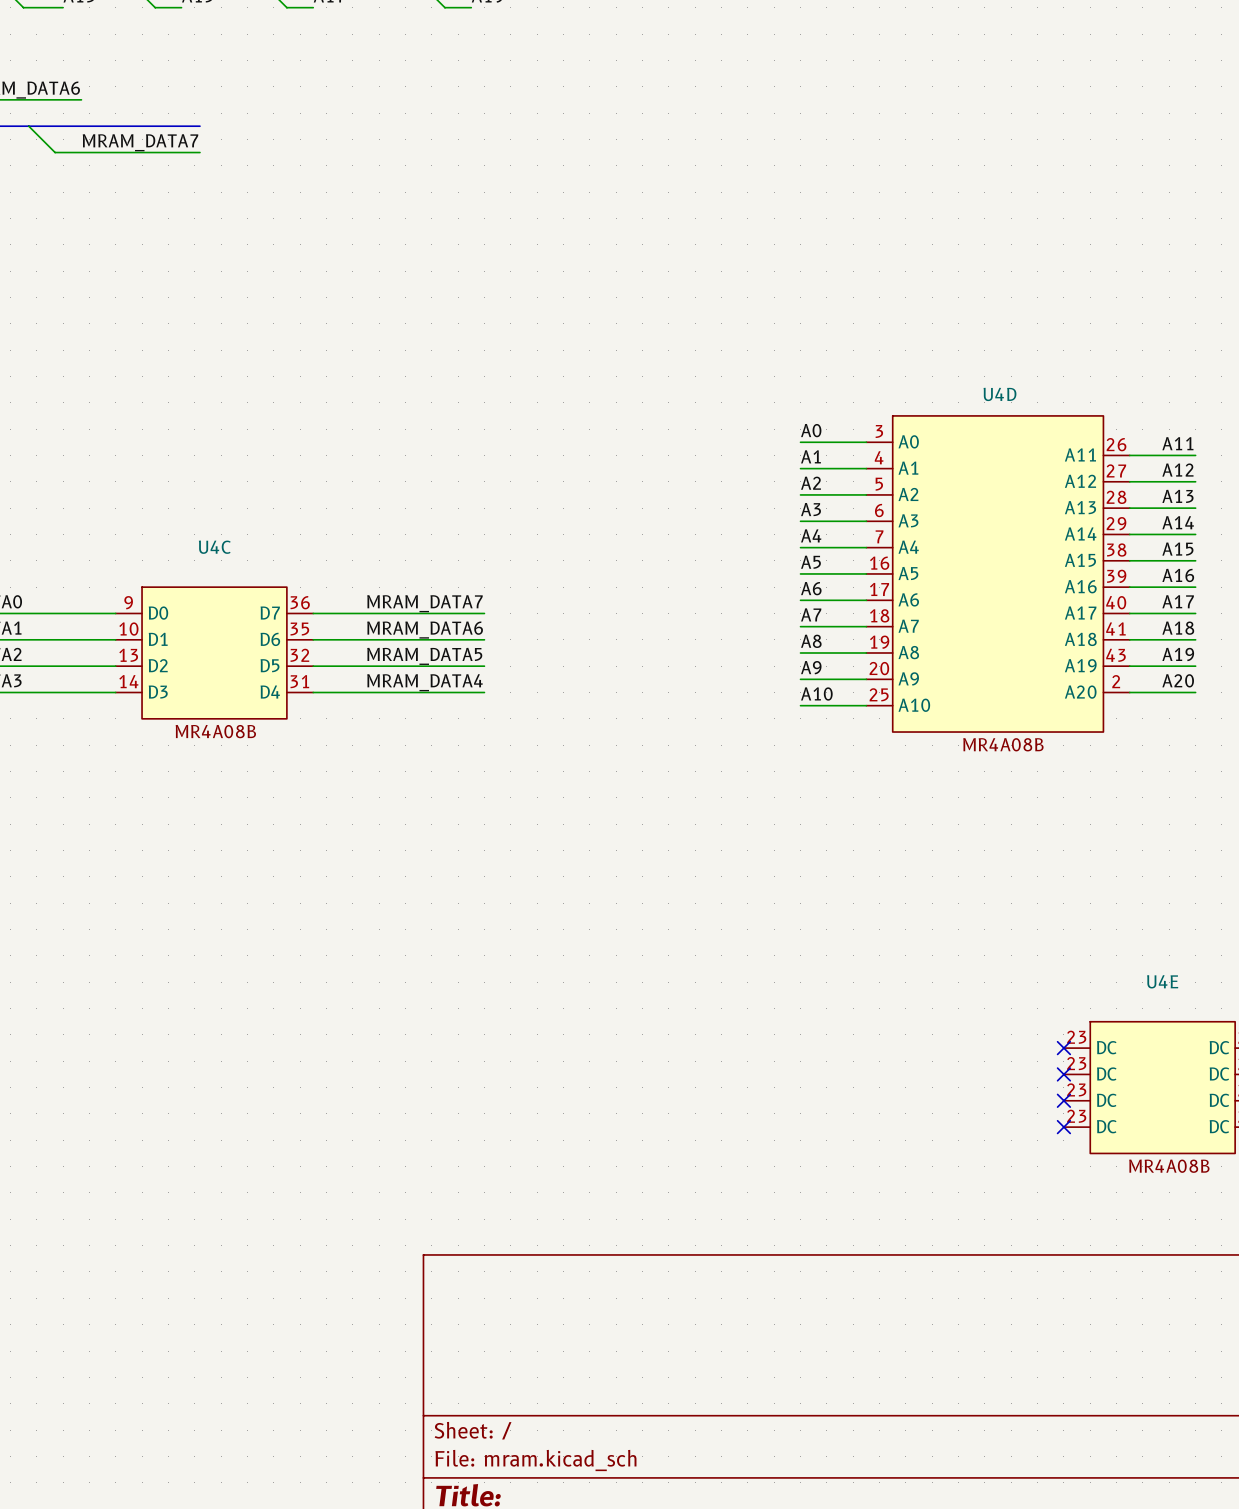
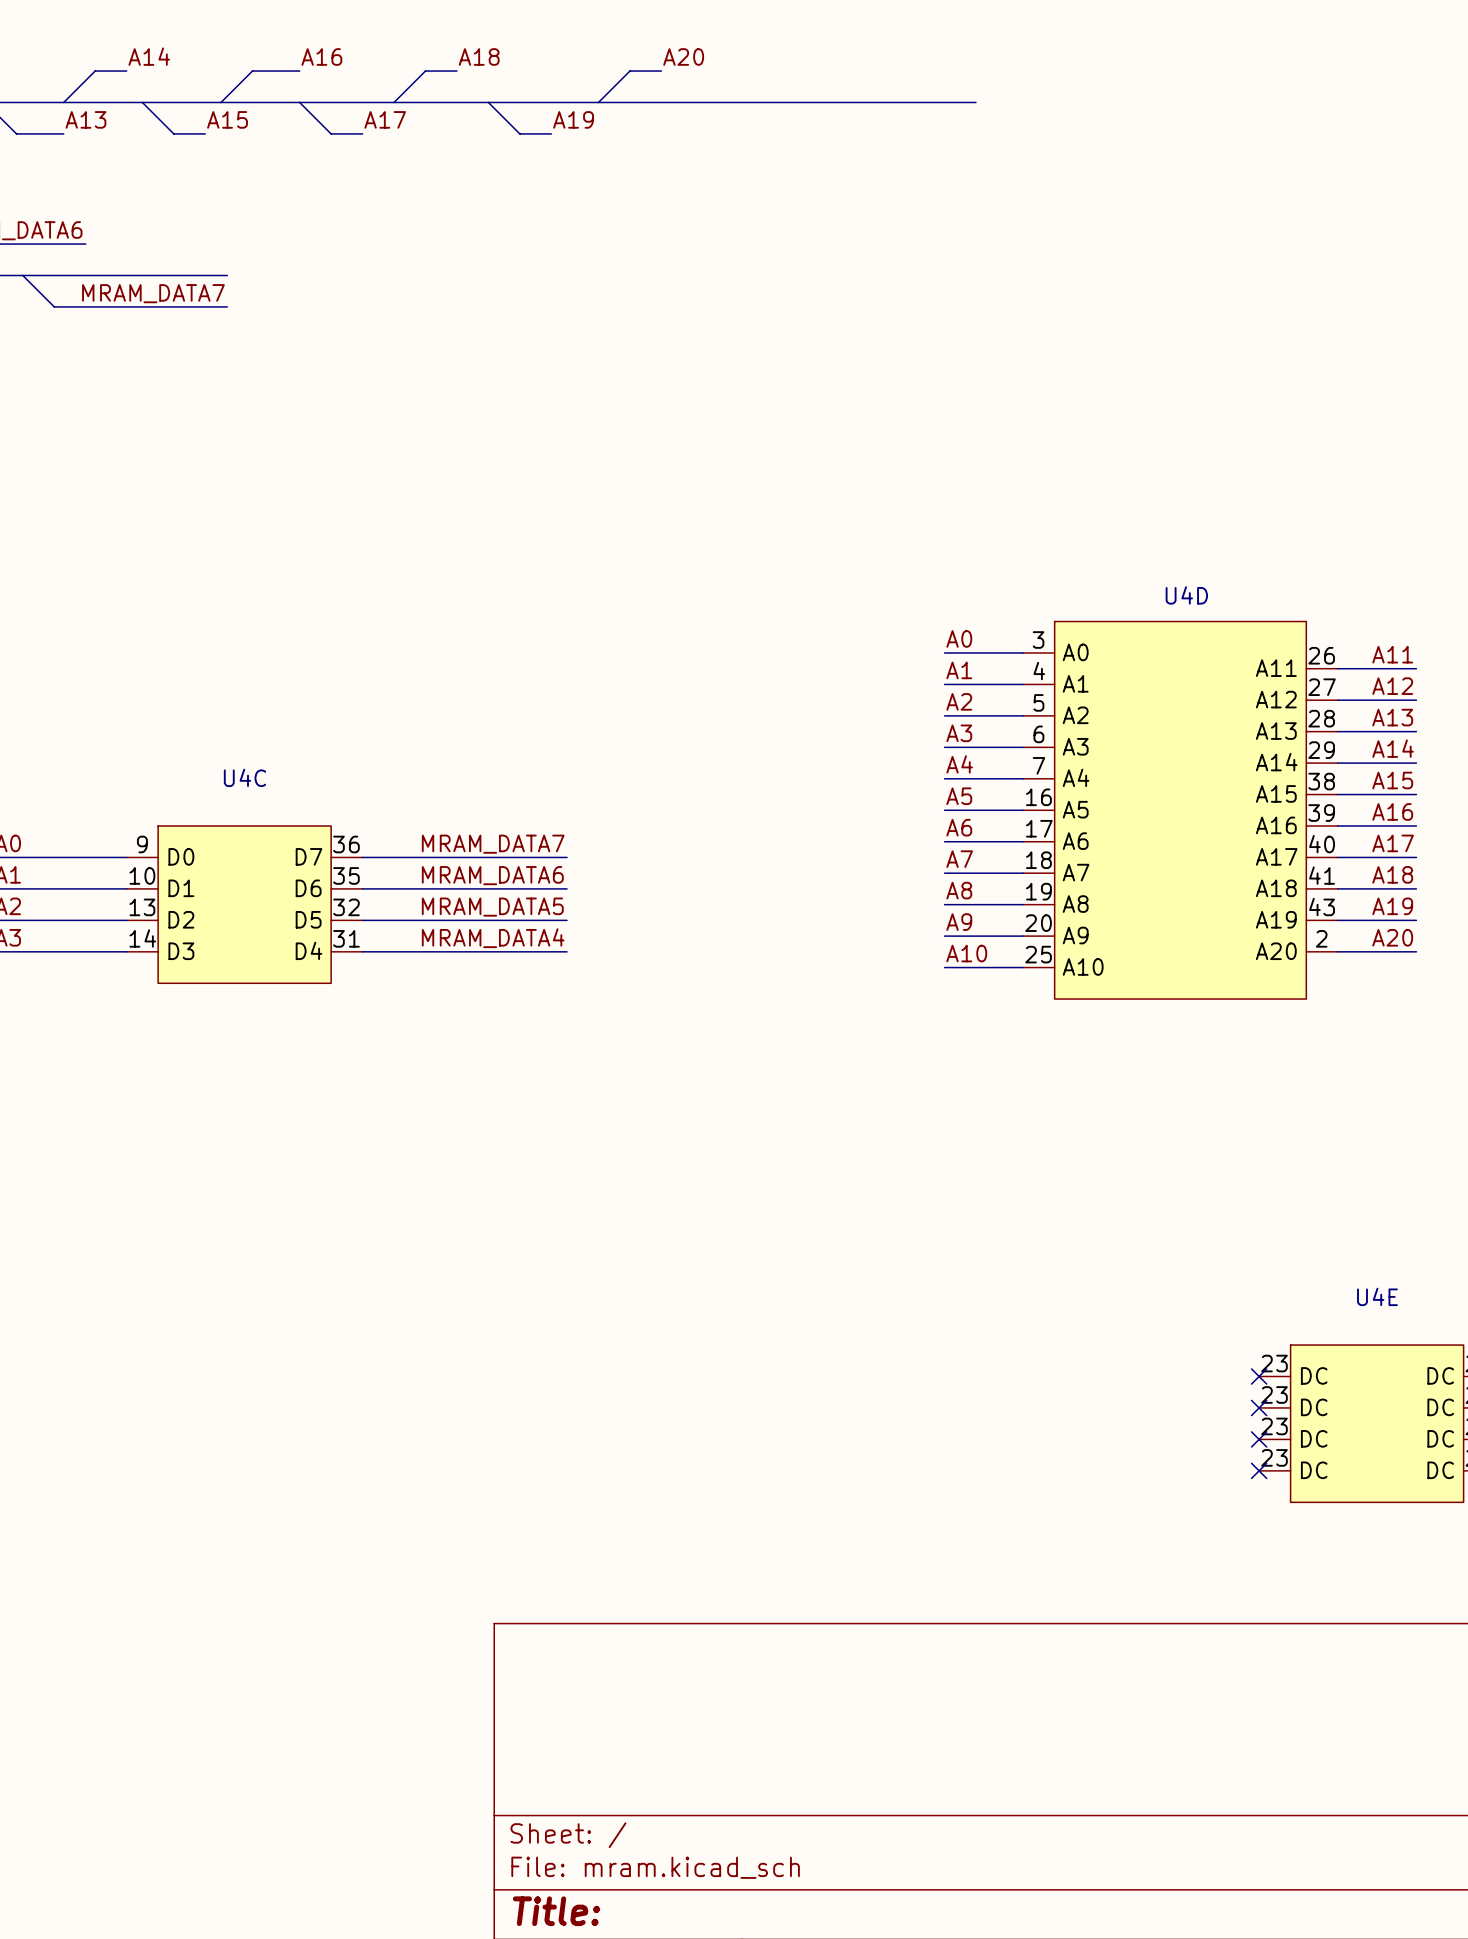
U4C text: MR4A08B (215, 731) -> none
U4D text: MR4A08B (1003, 744) -> none
U4E text: MR4A08B (1169, 1166) -> none

